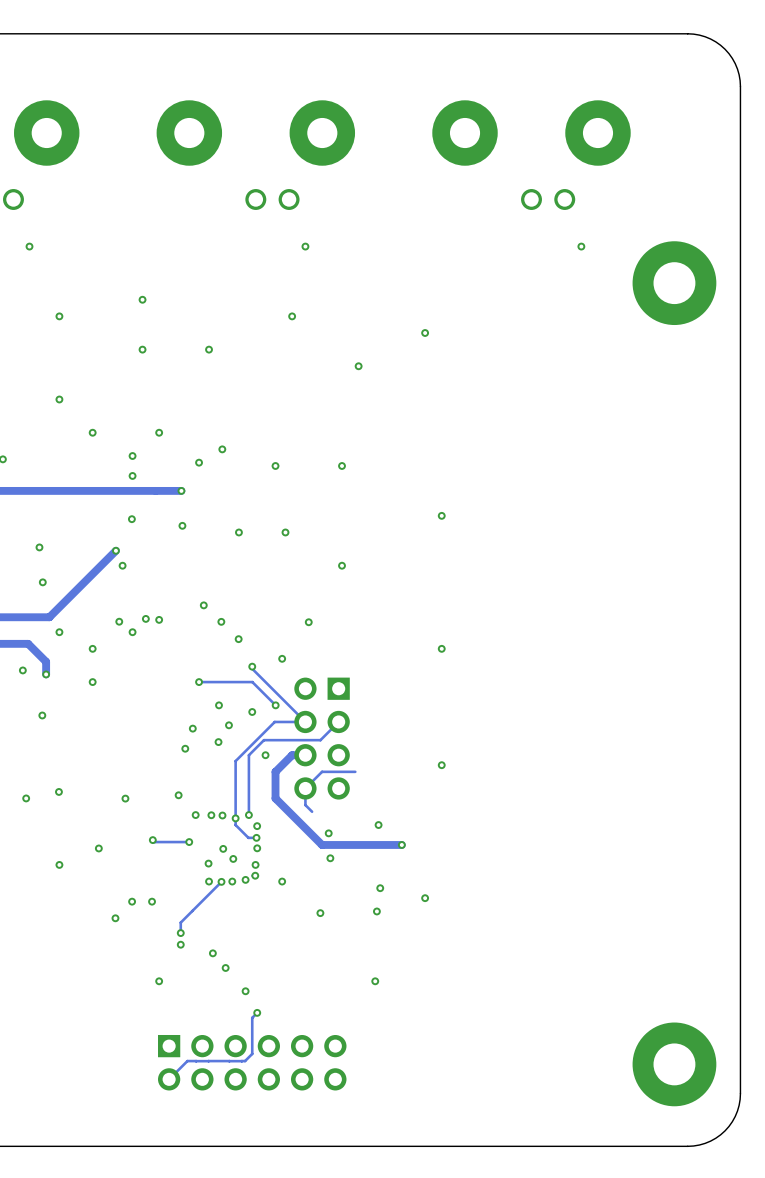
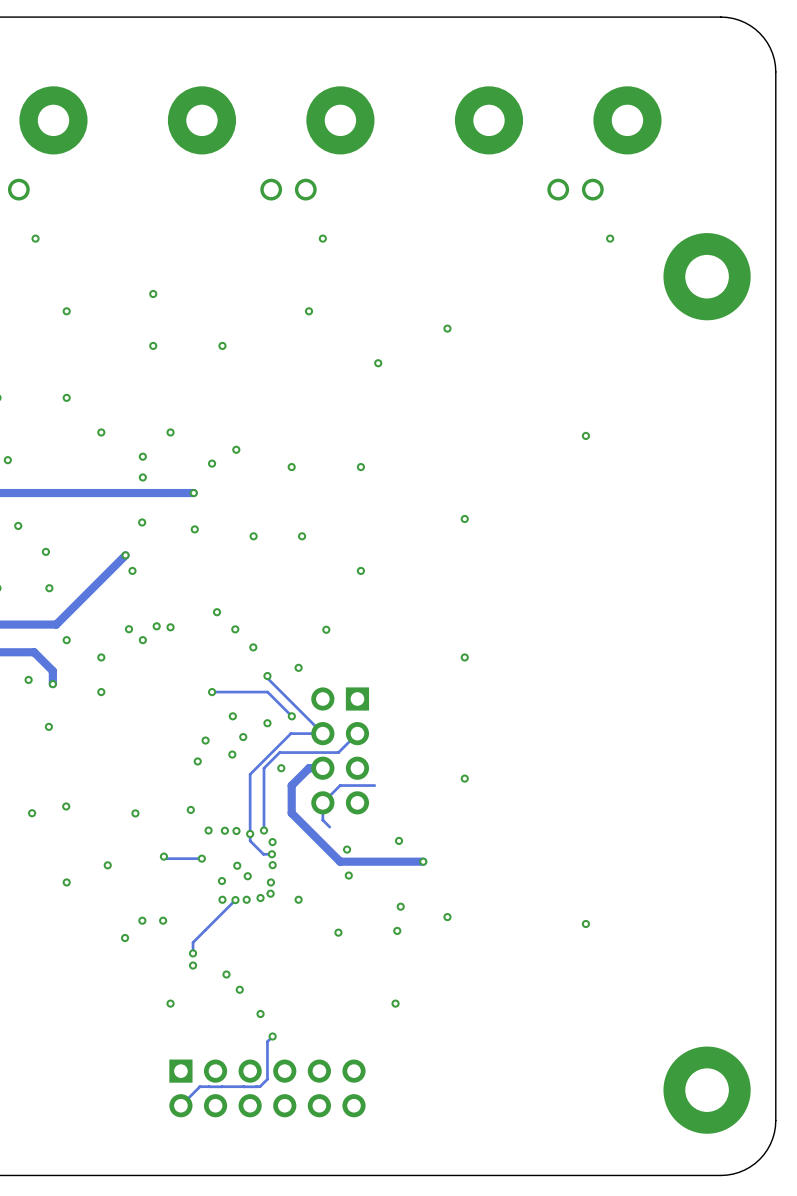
via: none -> (585, 435)
via: none -> (18, 525)
via: none -> (585, 923)

